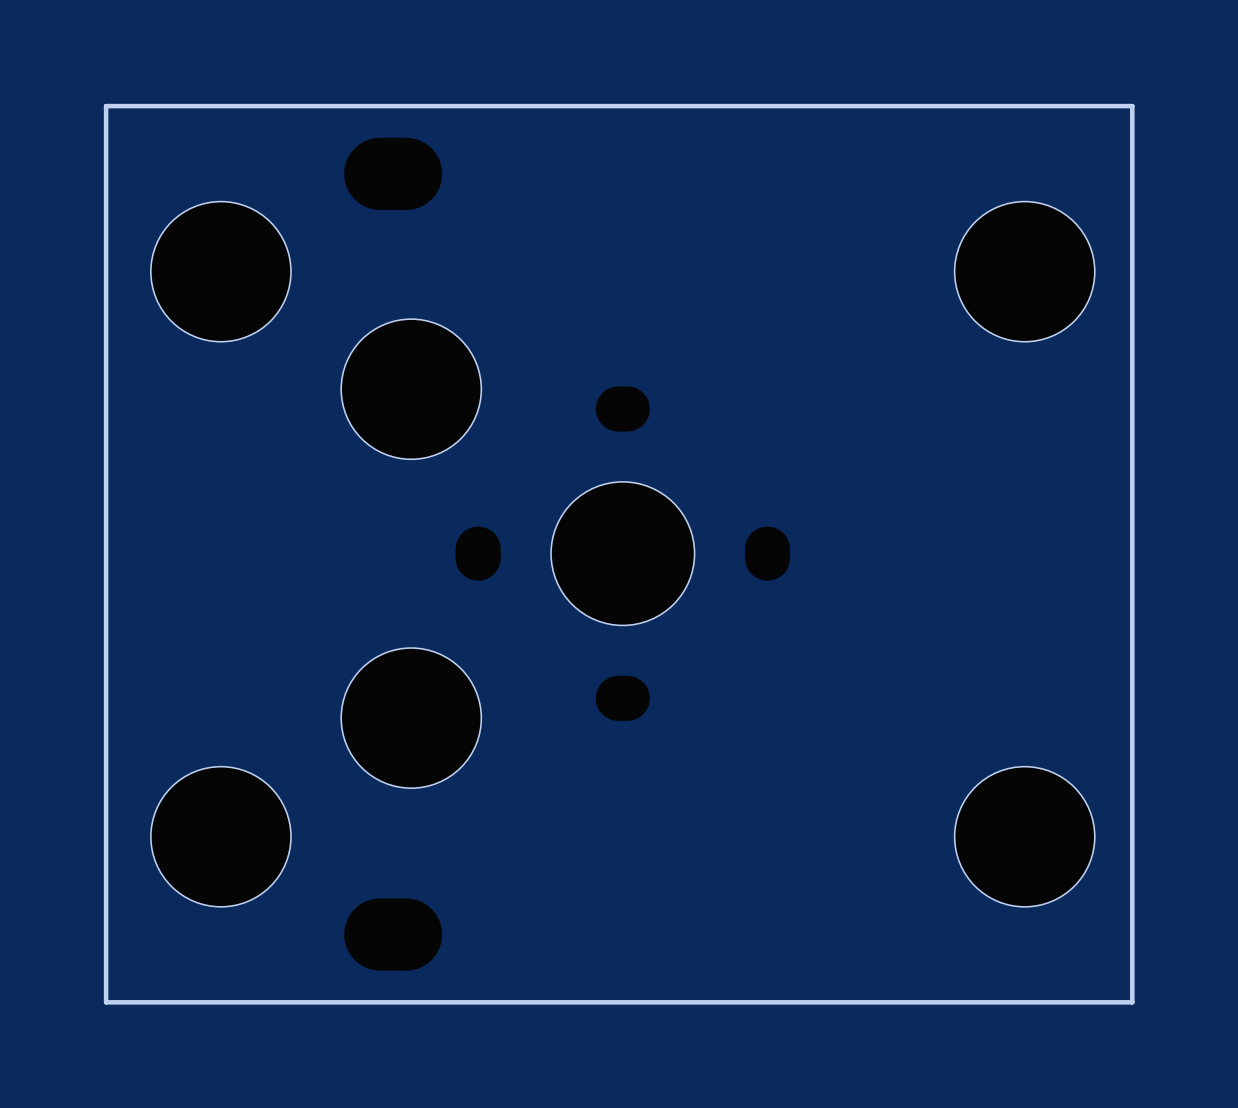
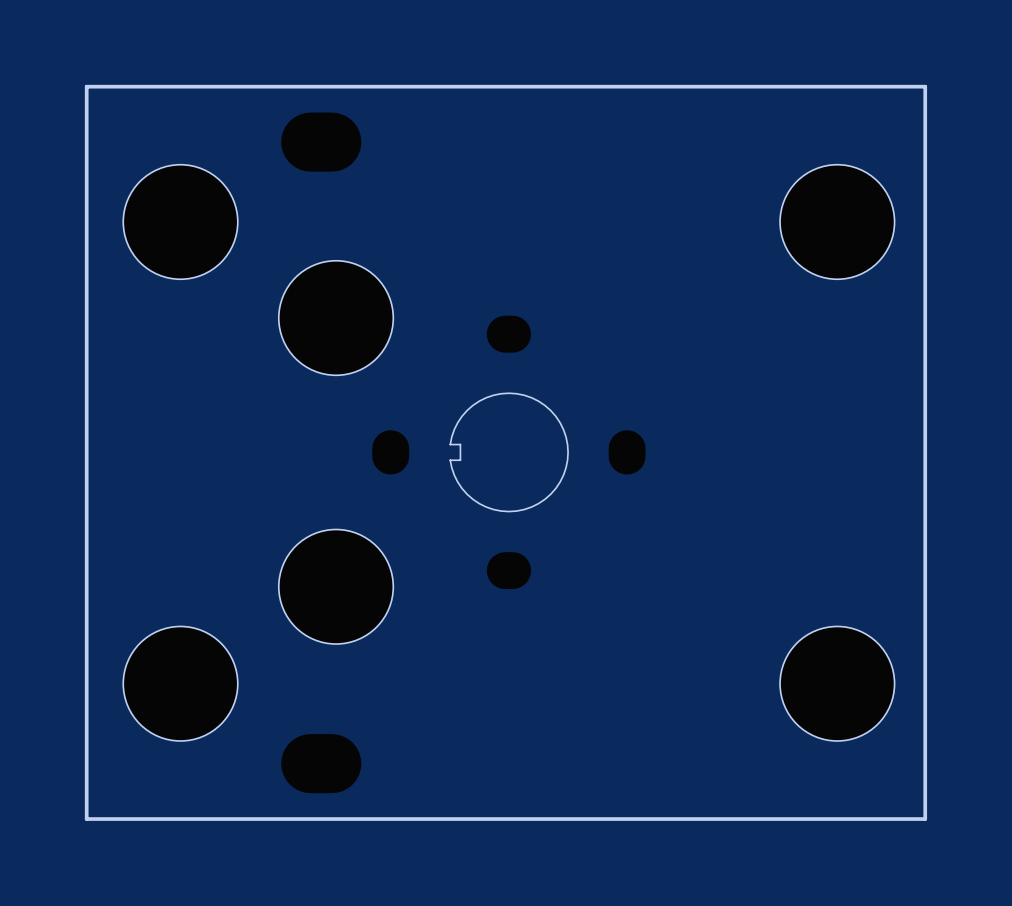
part footprint: [455, 386, 791, 721] -> [372, 315, 646, 590]

